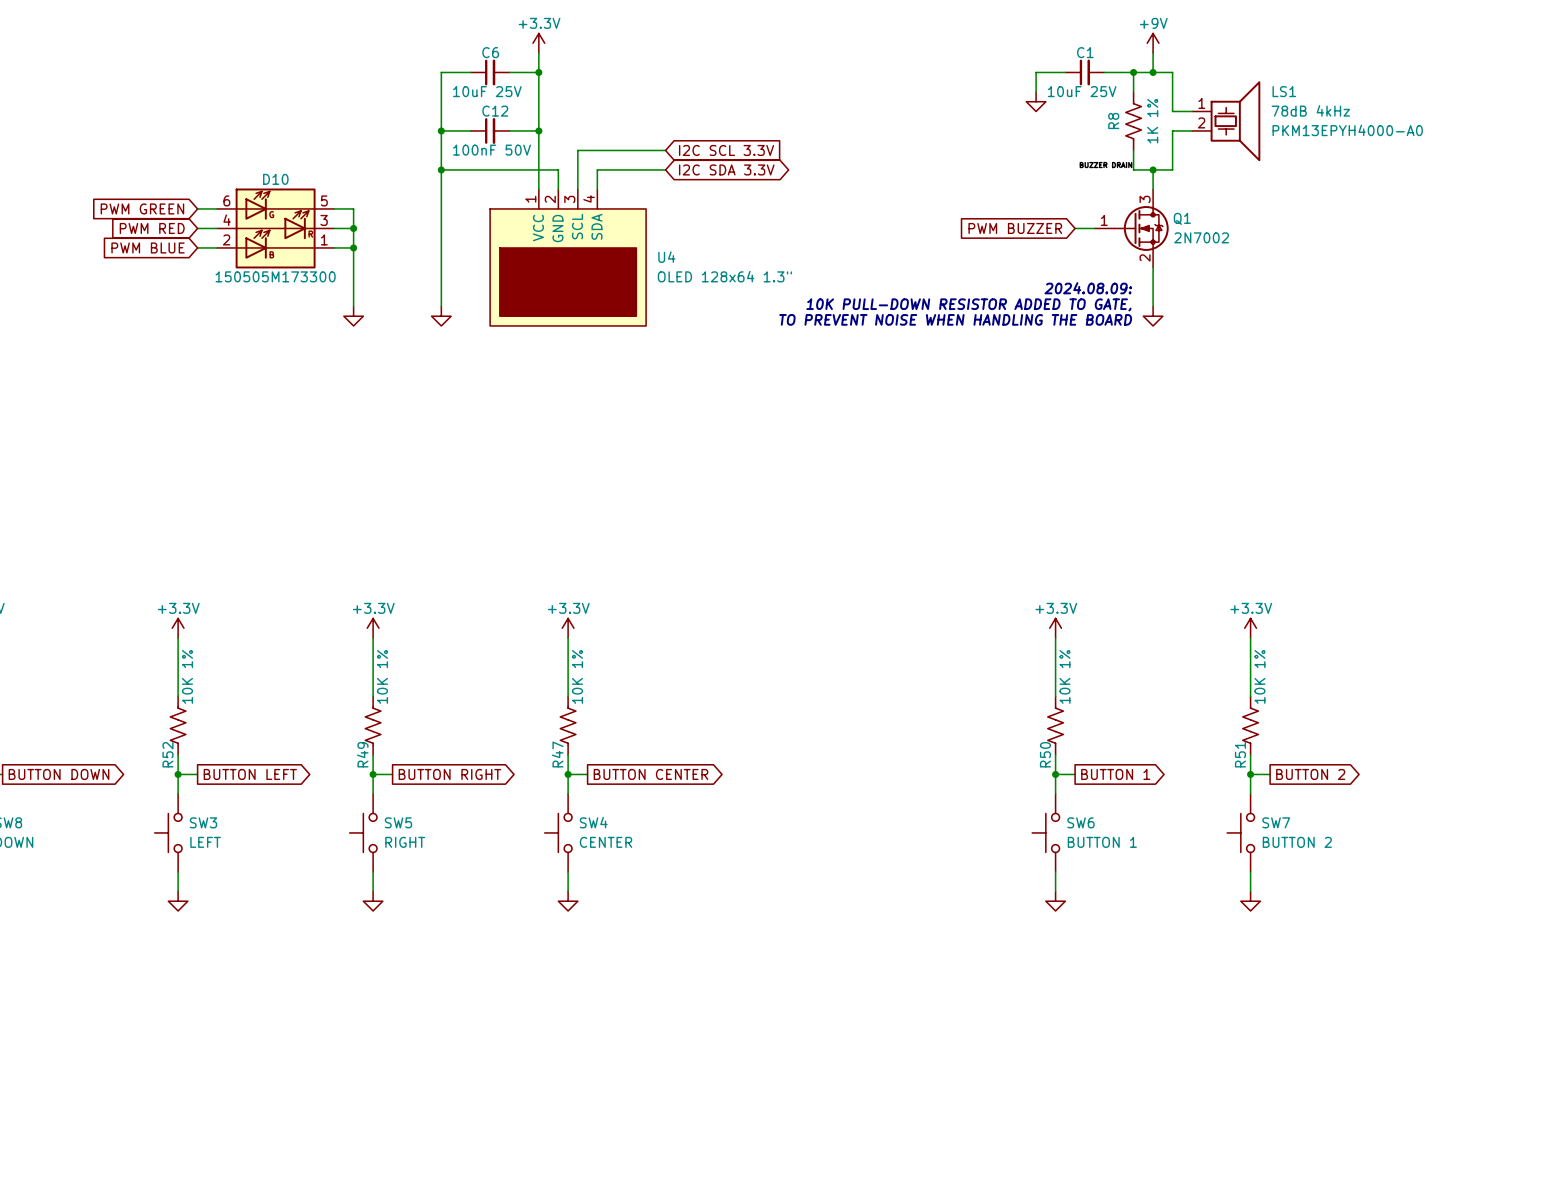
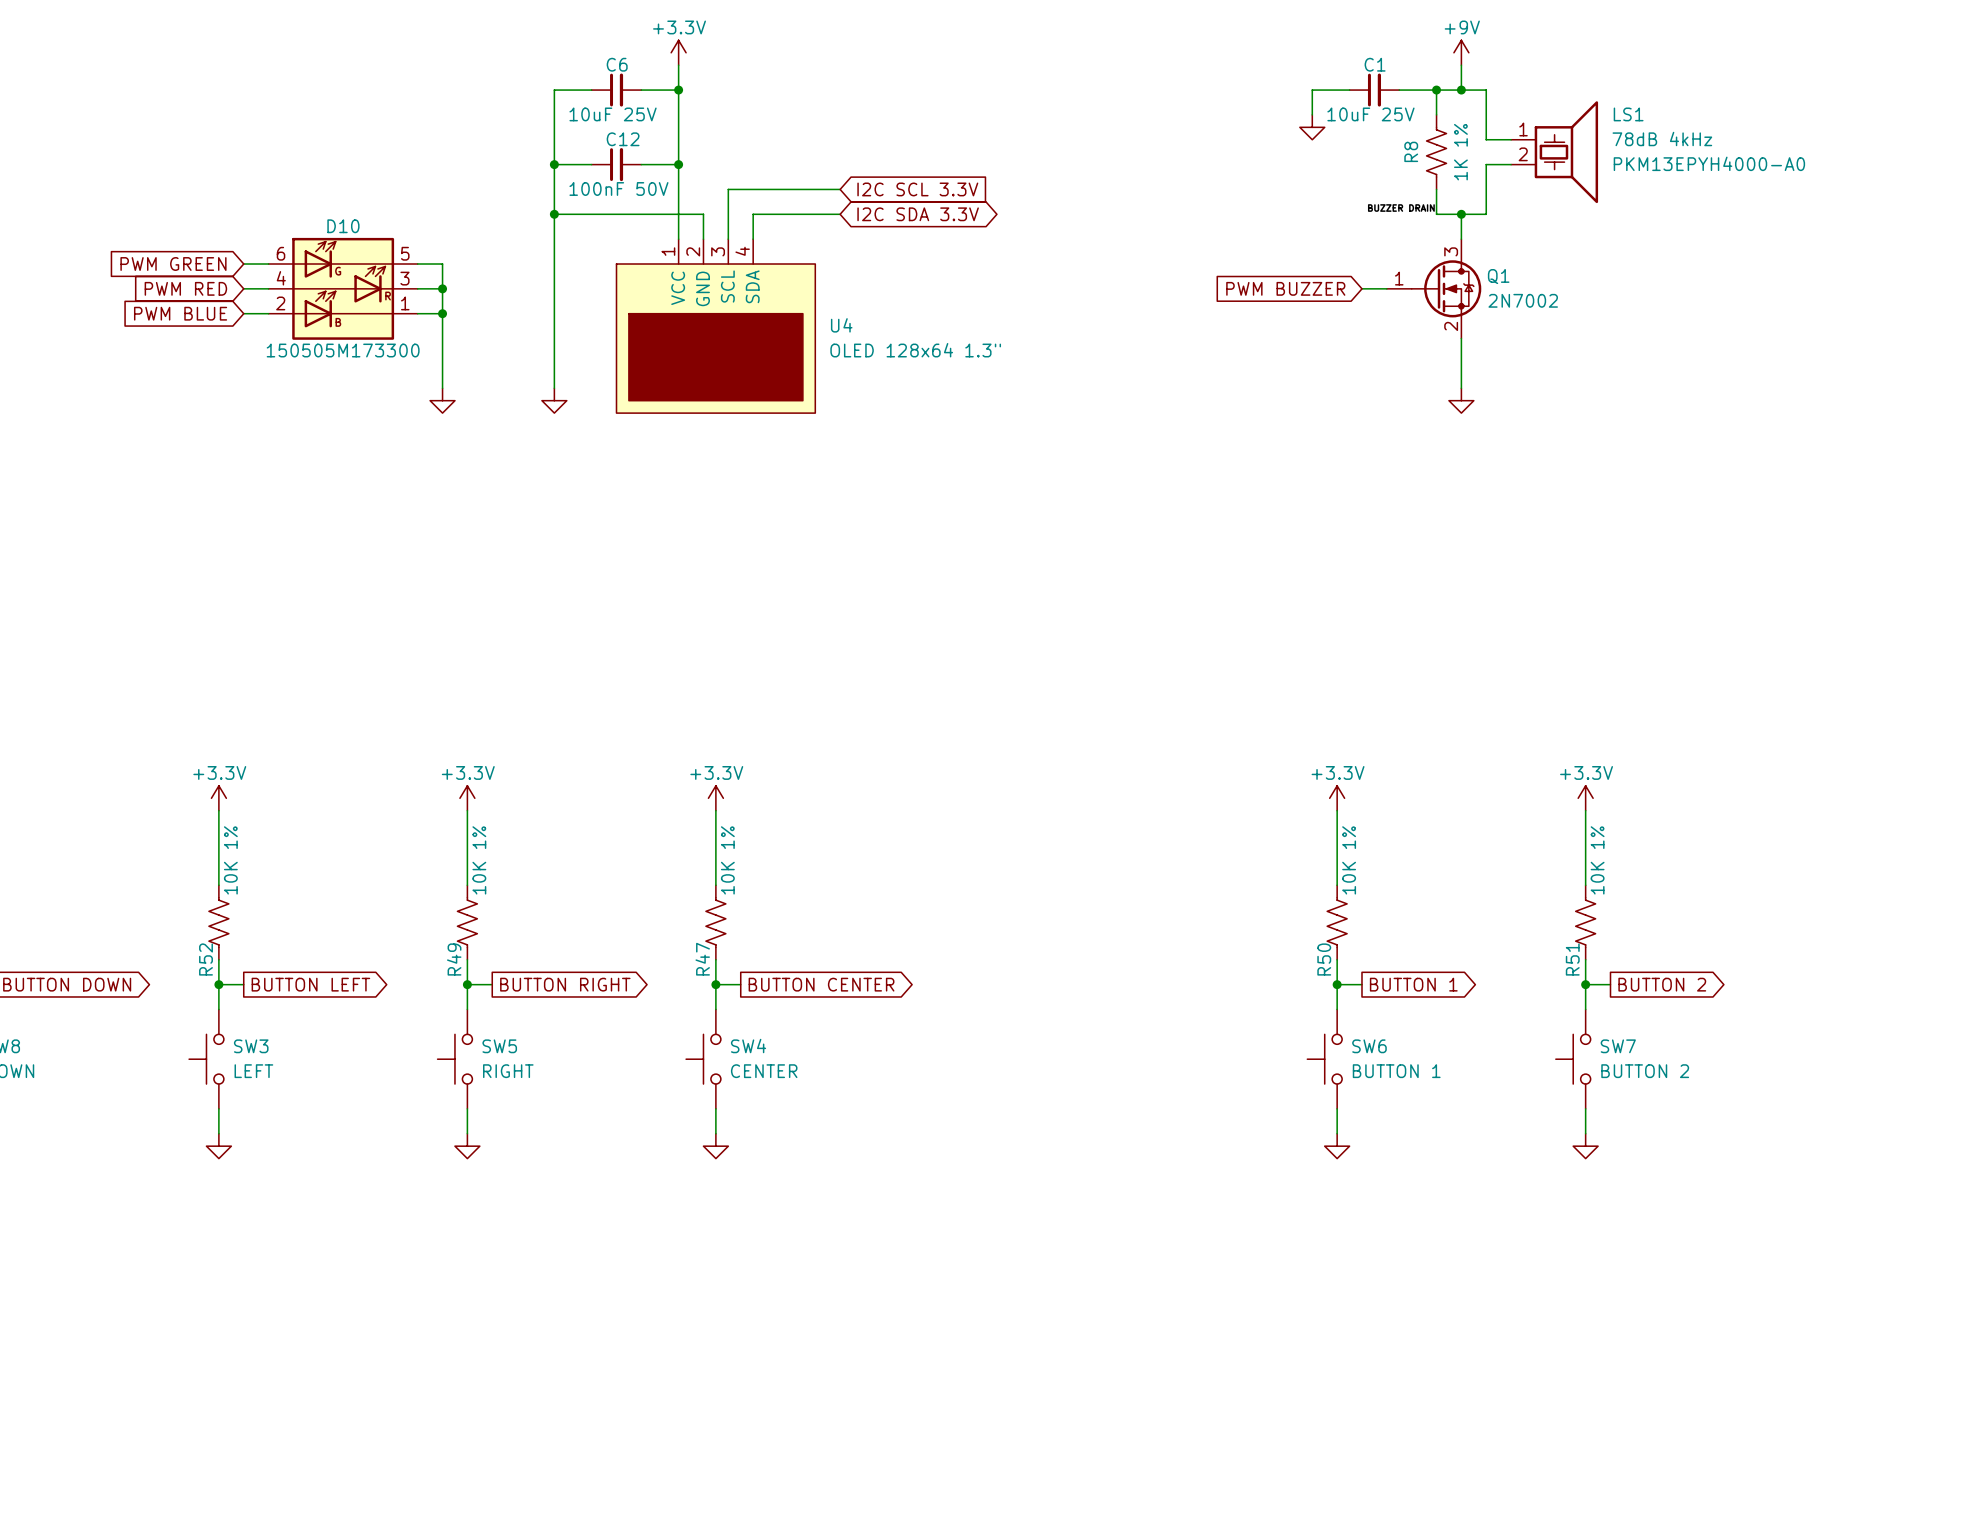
text: 2024.08.09: (1088, 288) -> none
text: 10K PULL-DOWN RESISTOR ADDED TO GATE, (968, 304) -> none
text: TO PREVENT NOISE WHEN HANDLING THE BOARD (955, 319) -> none

